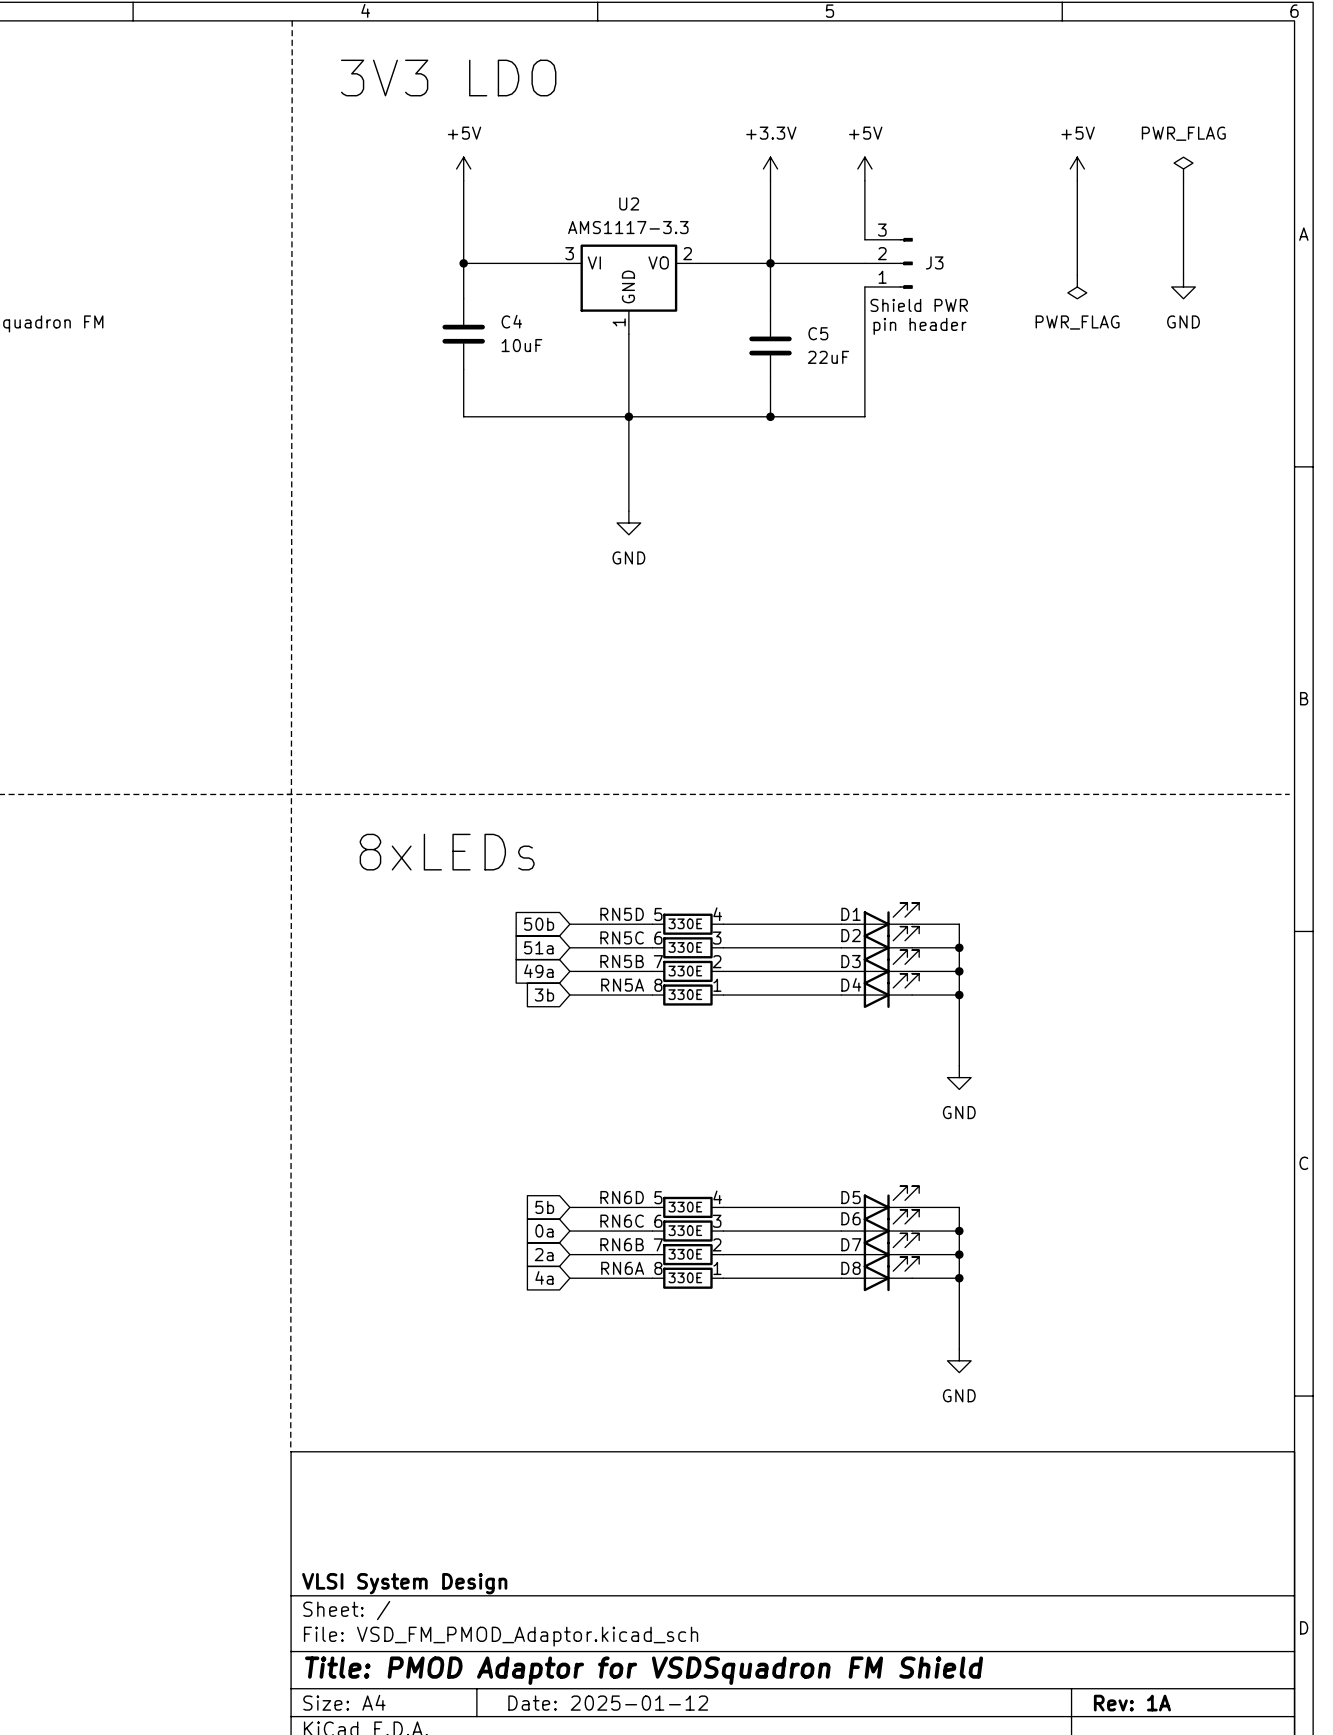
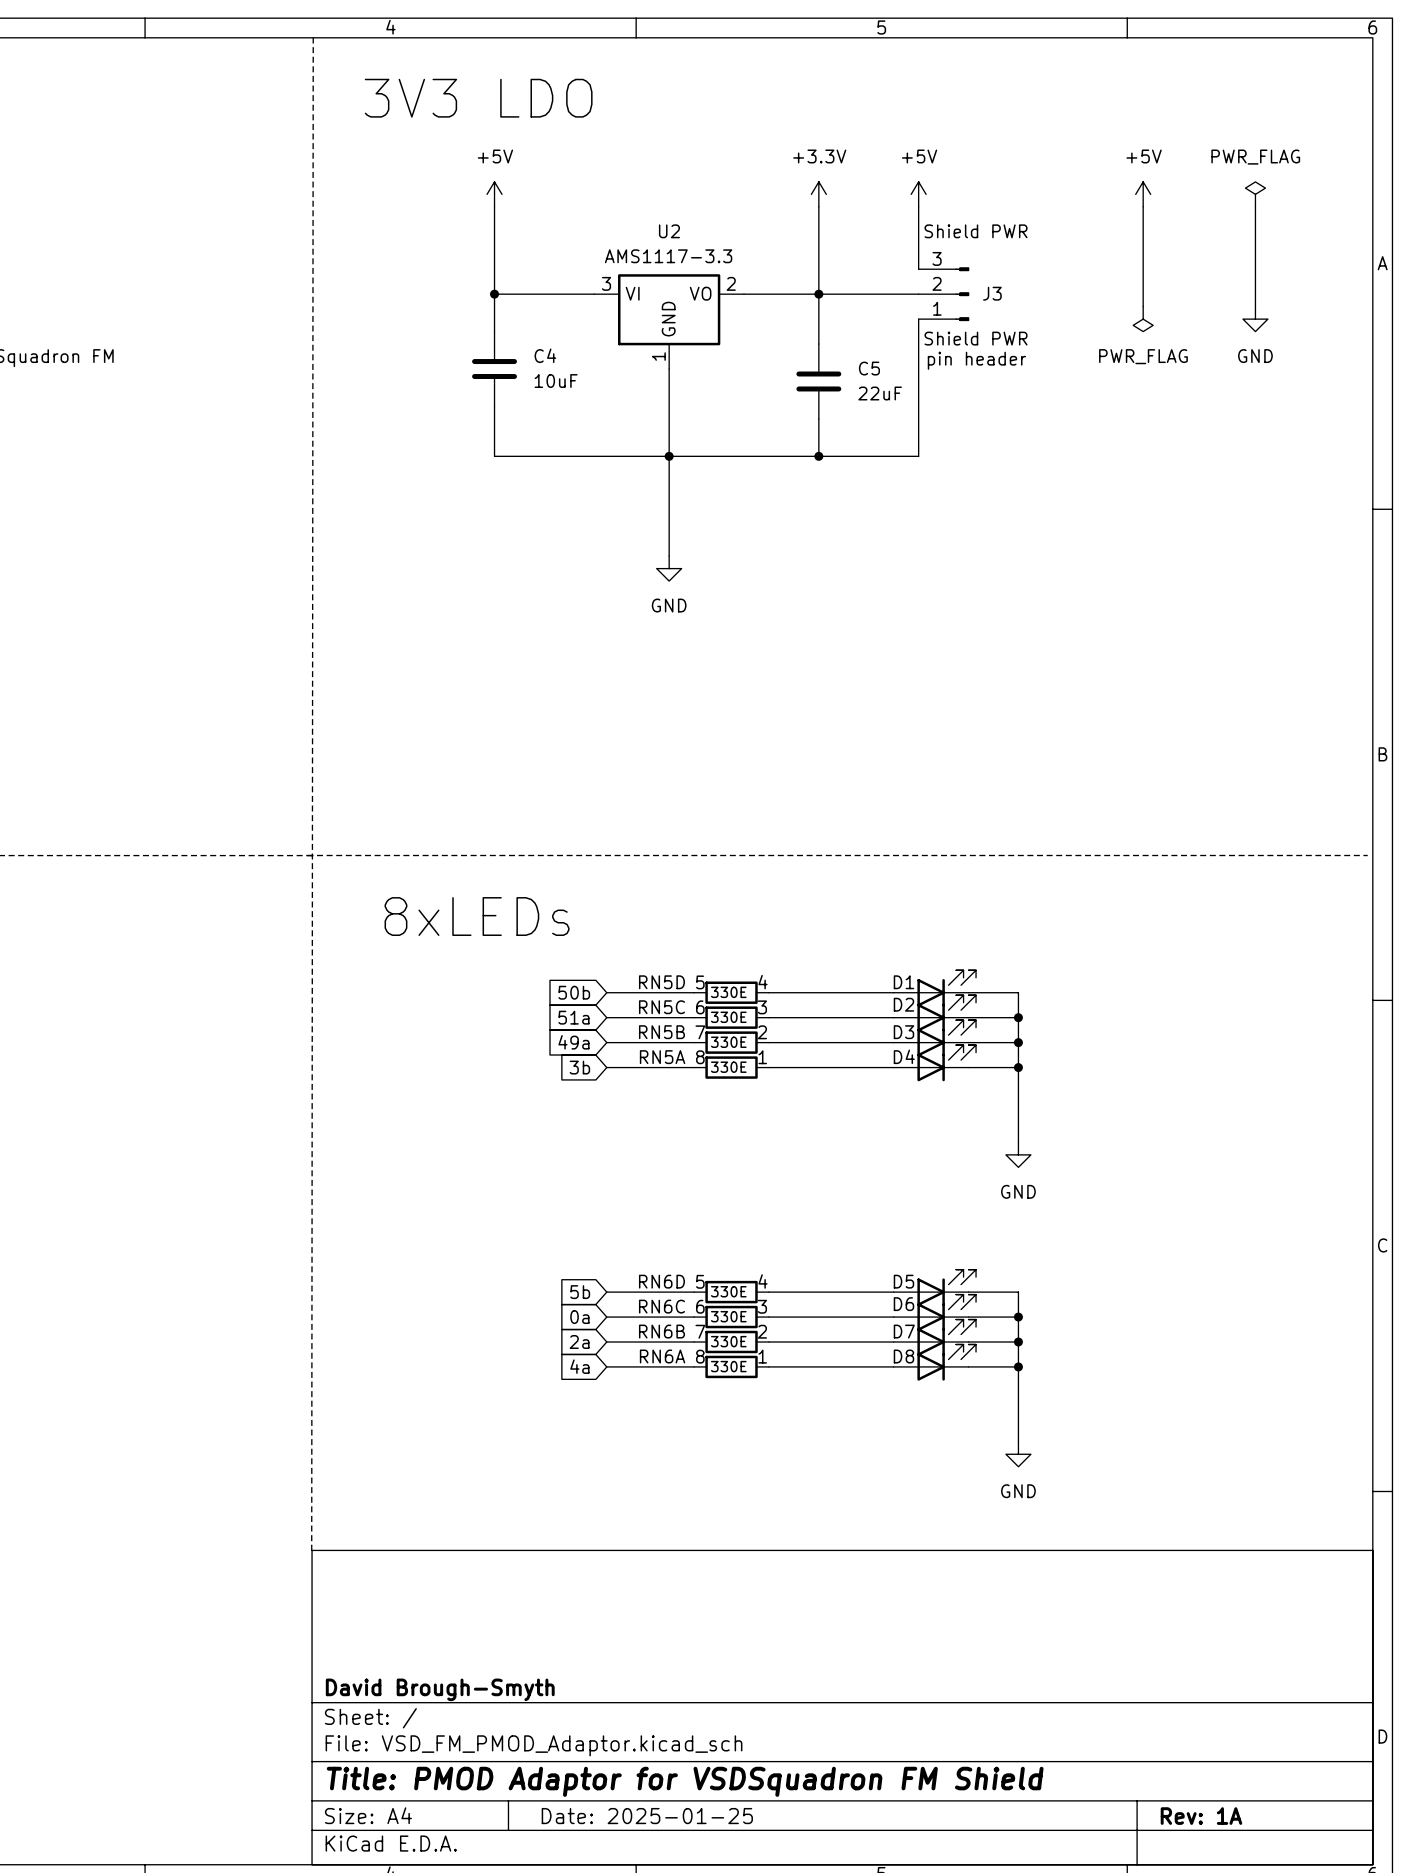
J3 value: none -> Shield PWR (976, 231)
title block: VLSI System Design (404, 1583) -> David Brough-Smyth (440, 1689)
title block: Date: 2025-01-12 (608, 1703) -> Date: 2025-01-25 (647, 1816)

